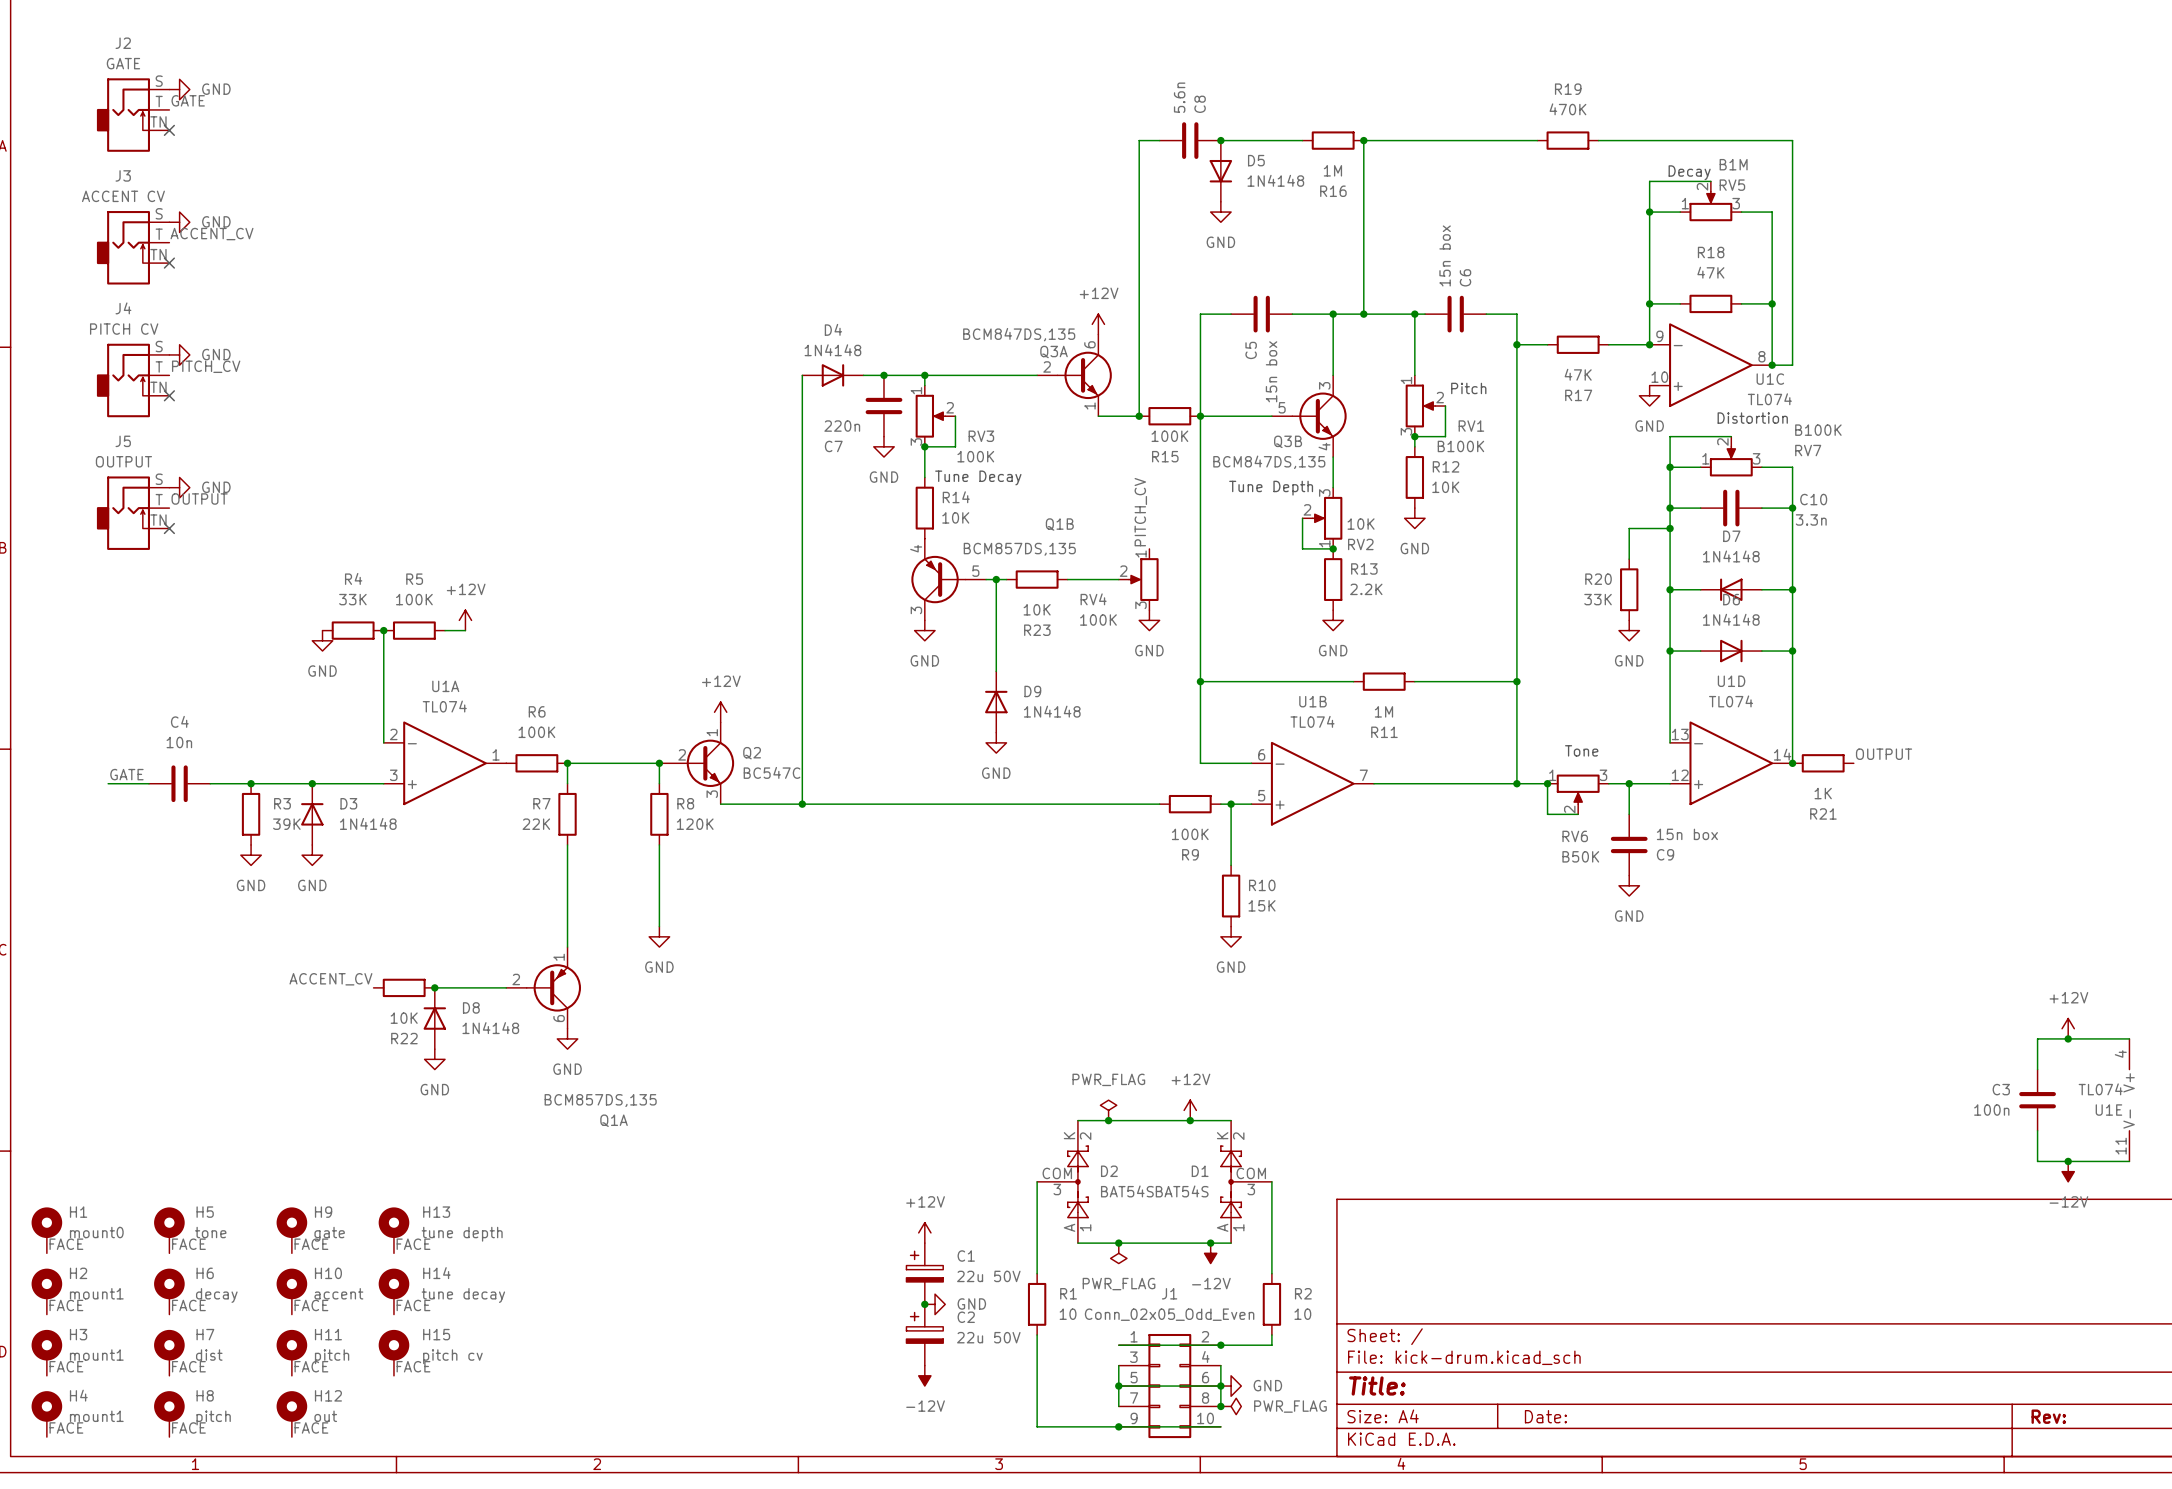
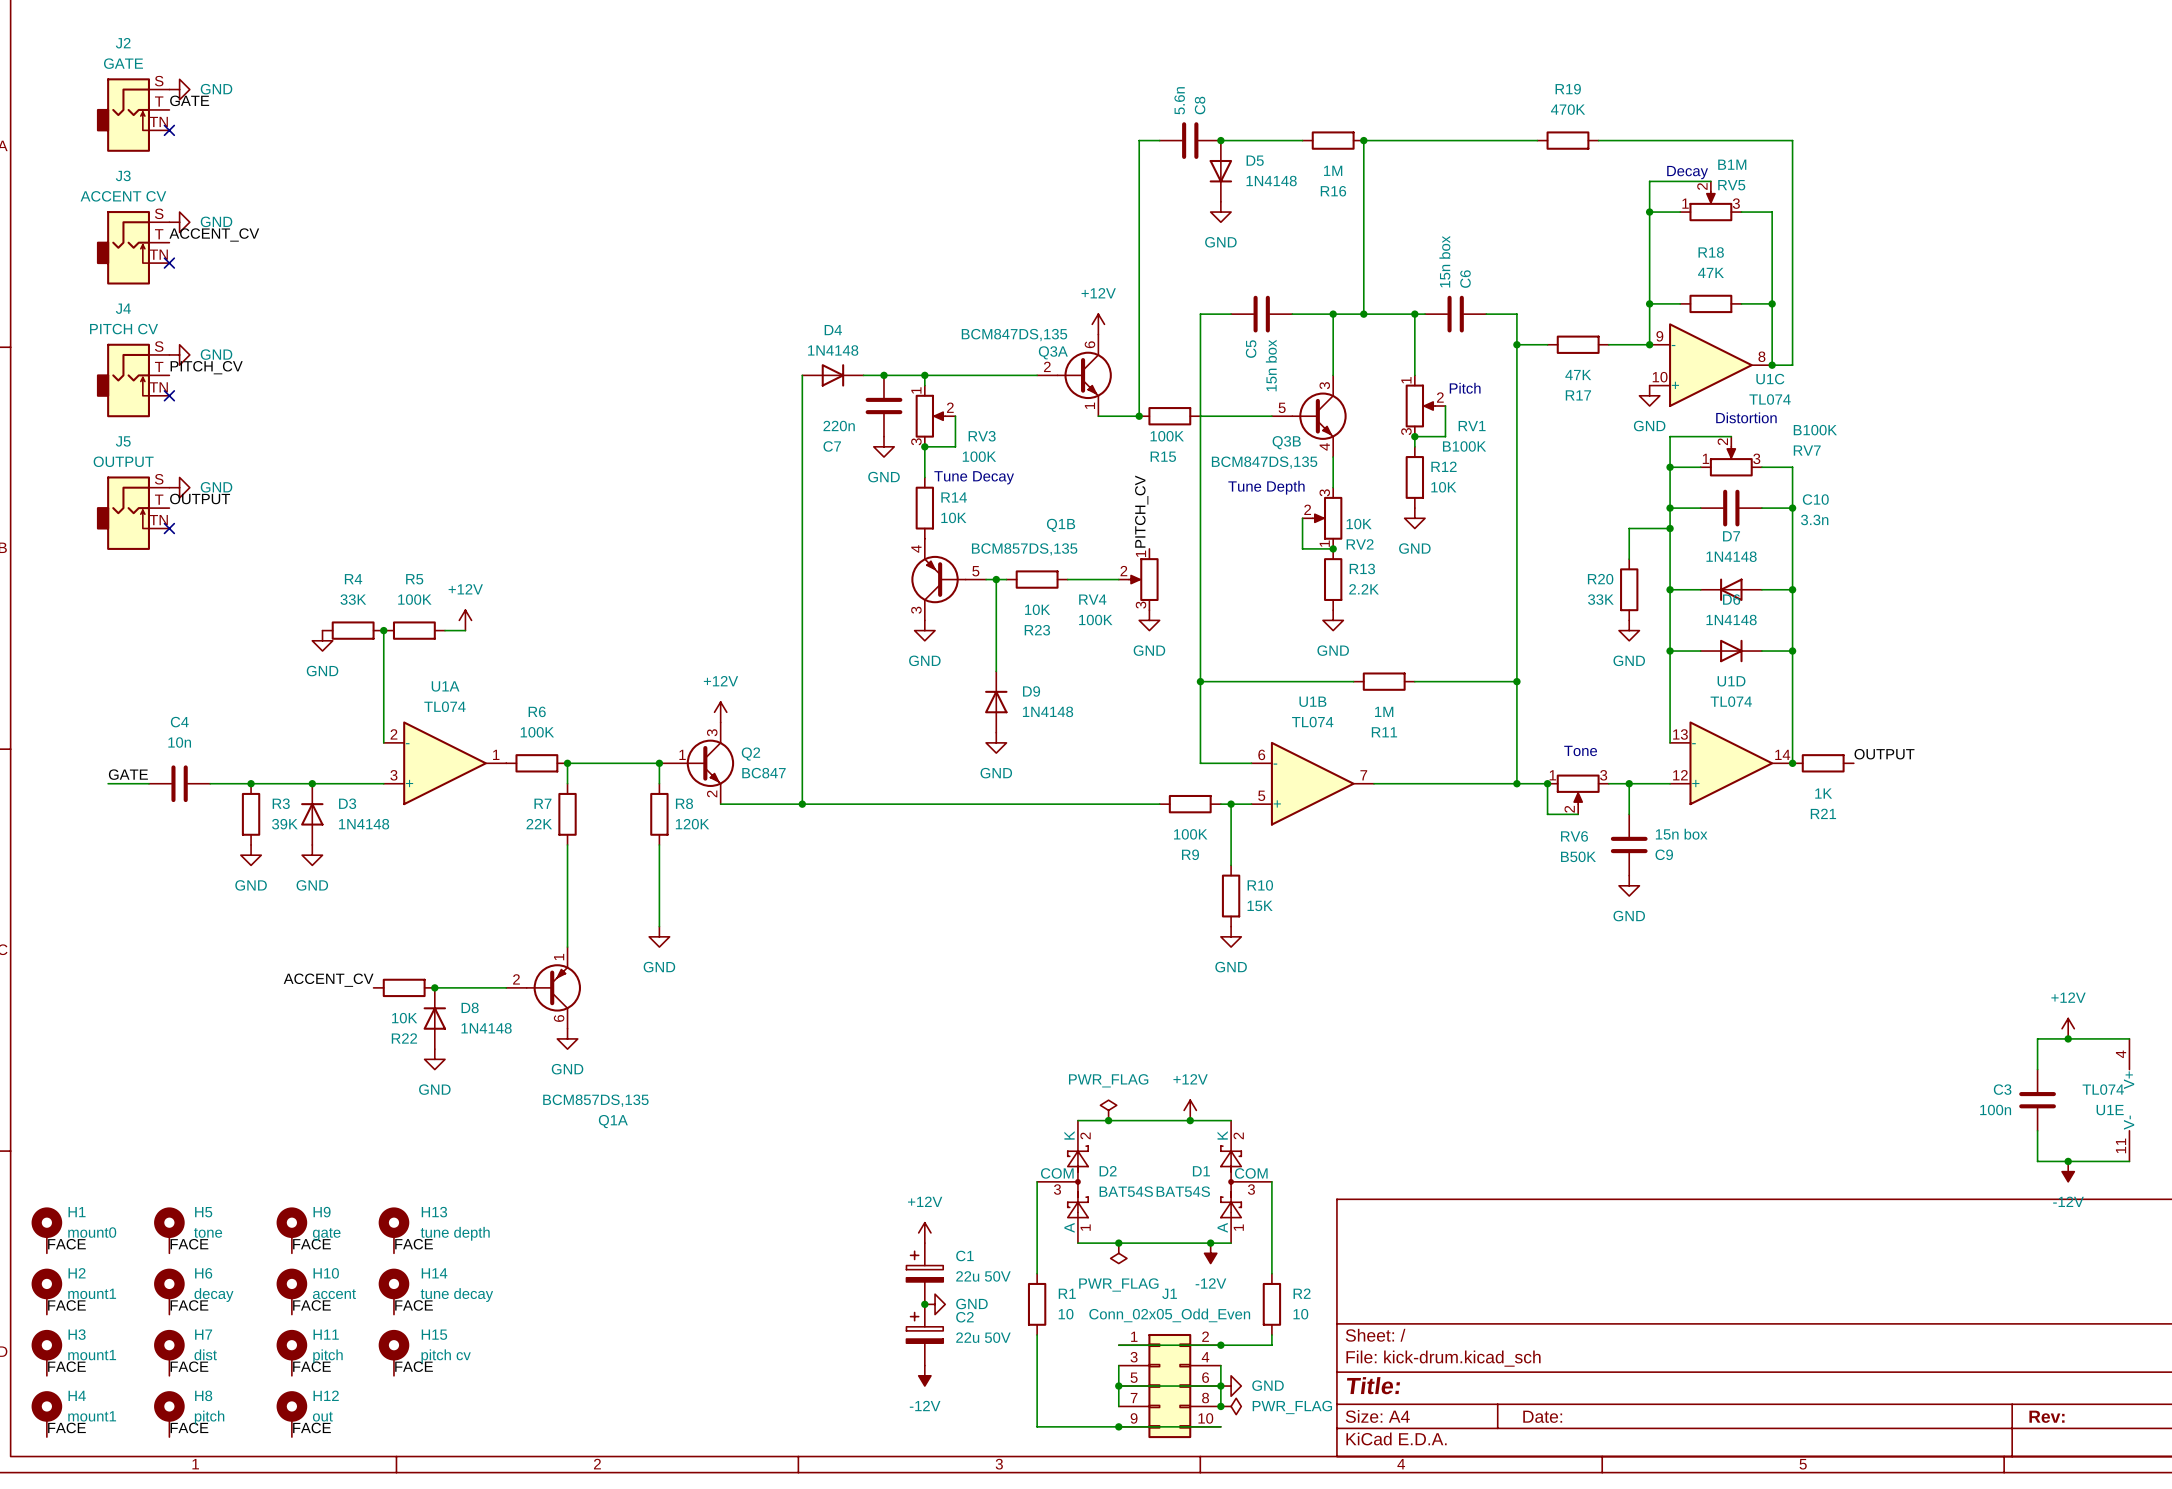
junction: (1200, 416) -> none
Q2 pin number: 1 (712, 732) -> 3 (712, 732)
Q2 pin number: 2 (682, 754) -> 1 (682, 754)
Q2 value: BC547C (772, 772) -> BC847 (763, 773)
Q2 pin number: 3 (712, 794) -> 2 (712, 793)

